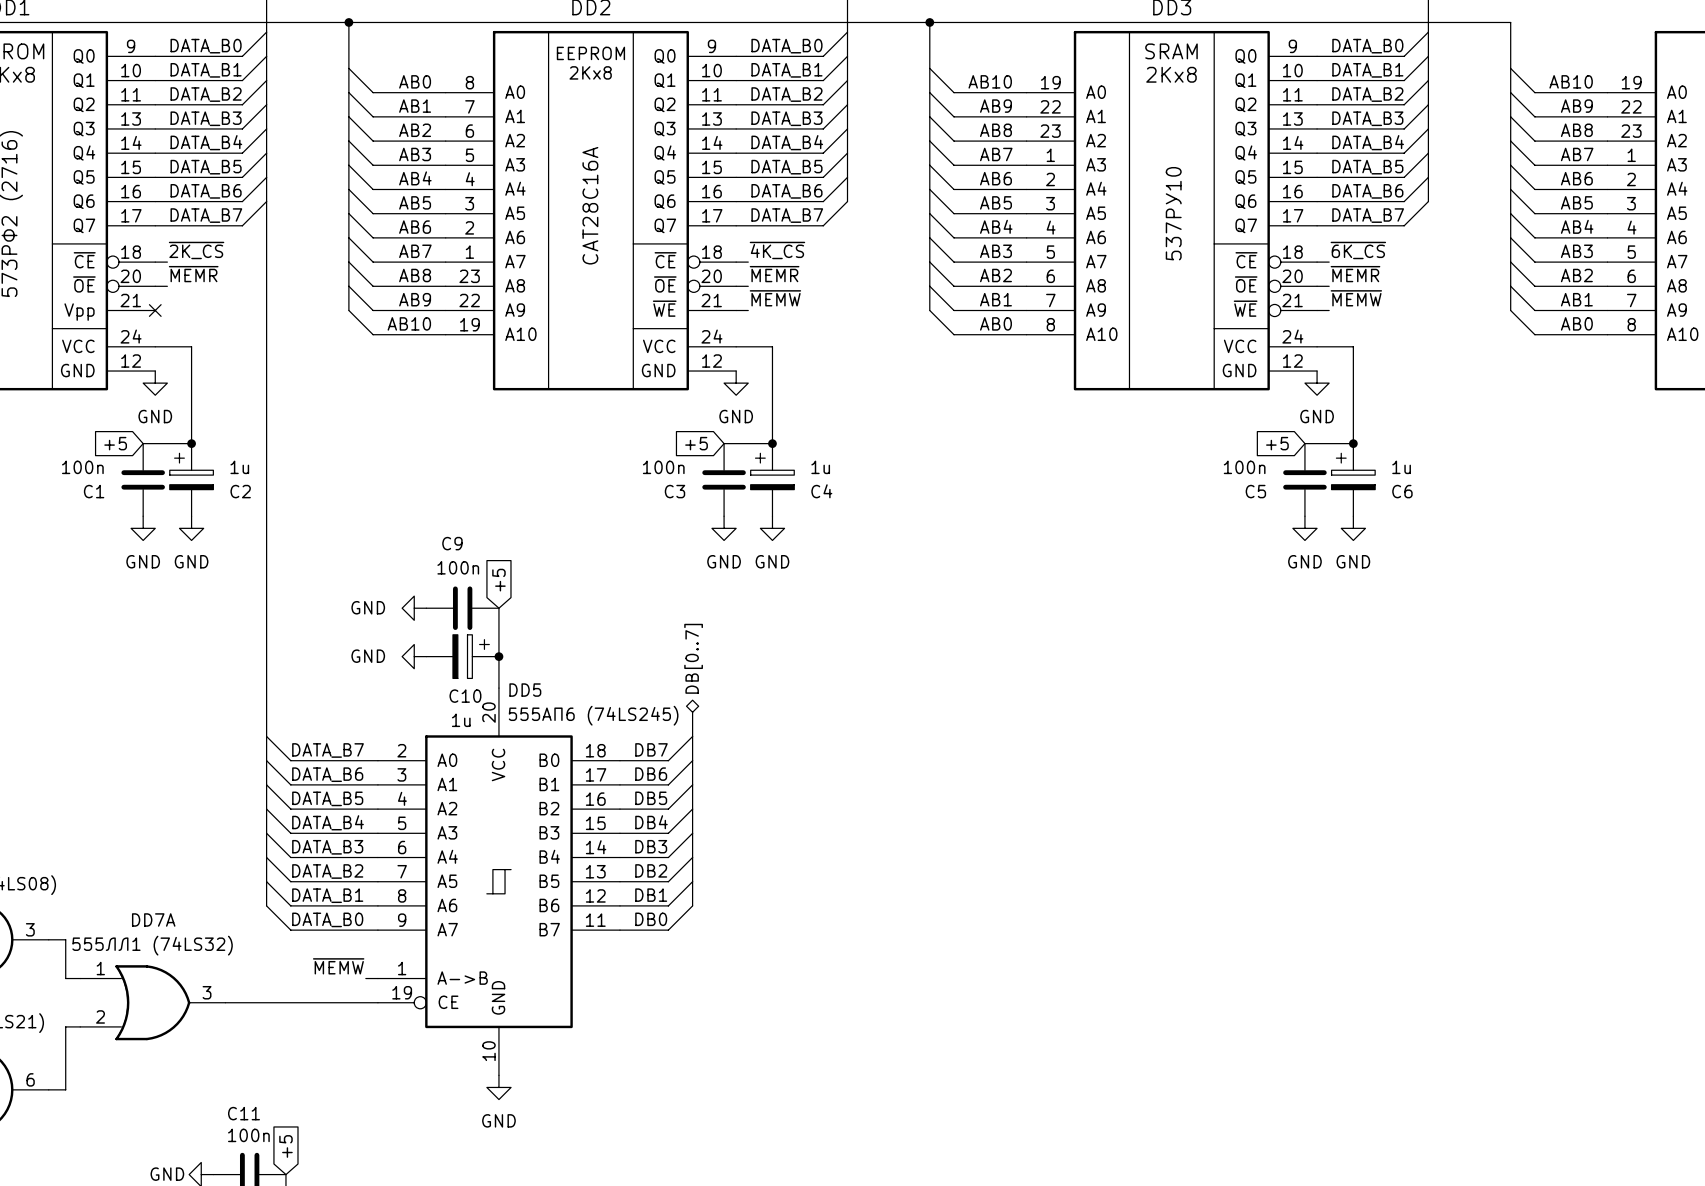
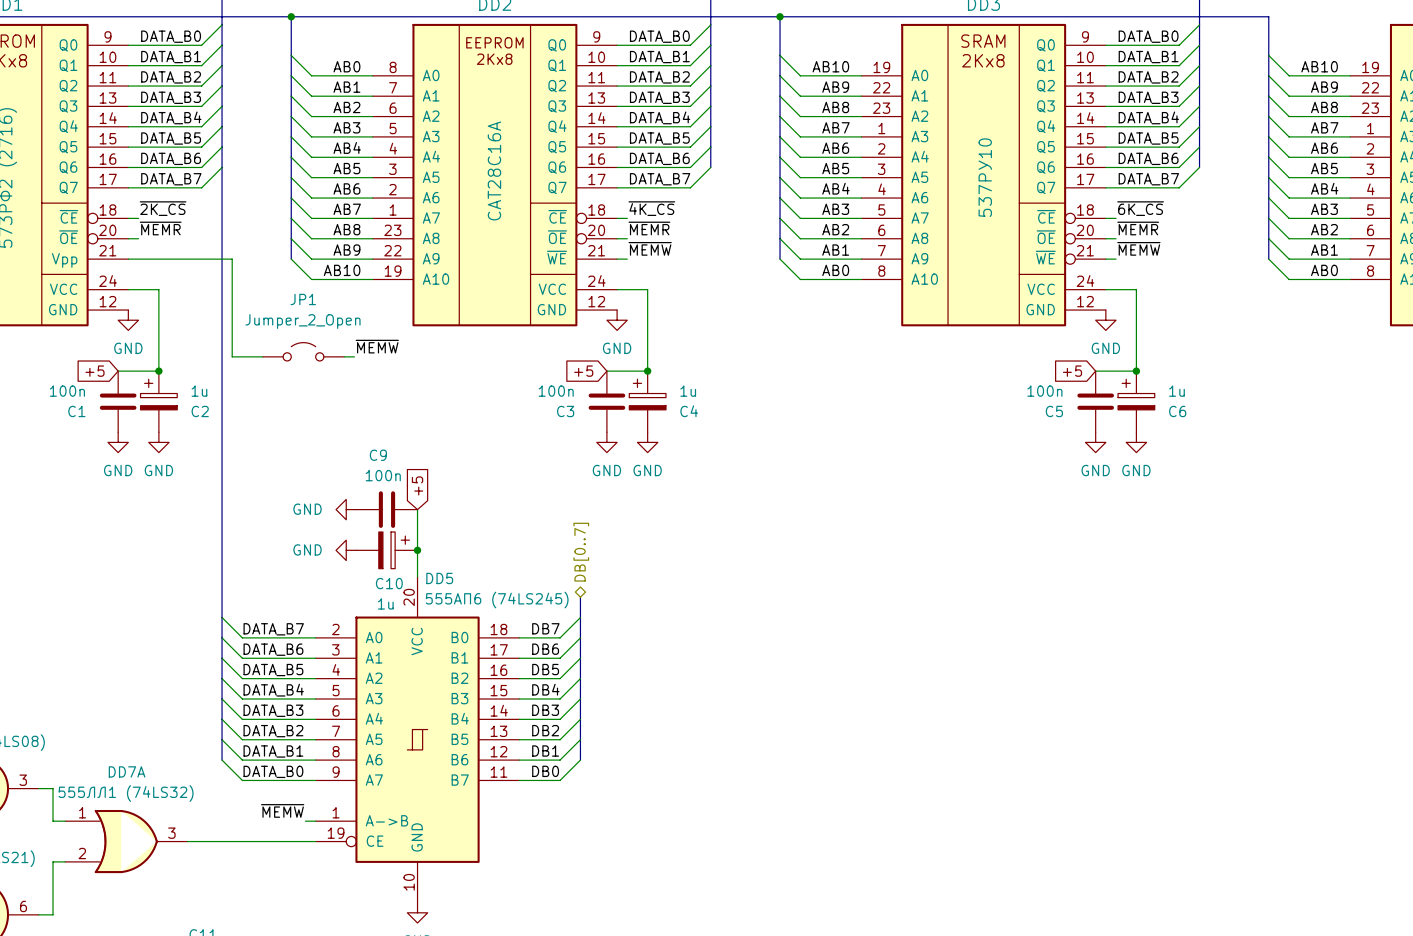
wire: none -> (128, 259) (232, 259) (232, 356) (262, 356)
no-connect mark: (155, 310) -> none
label: none -> ~{MEMW} (377, 346)
JP1: none -> Jumper_2_Open (303, 351)
wire: none -> (344, 356) (354, 356)

